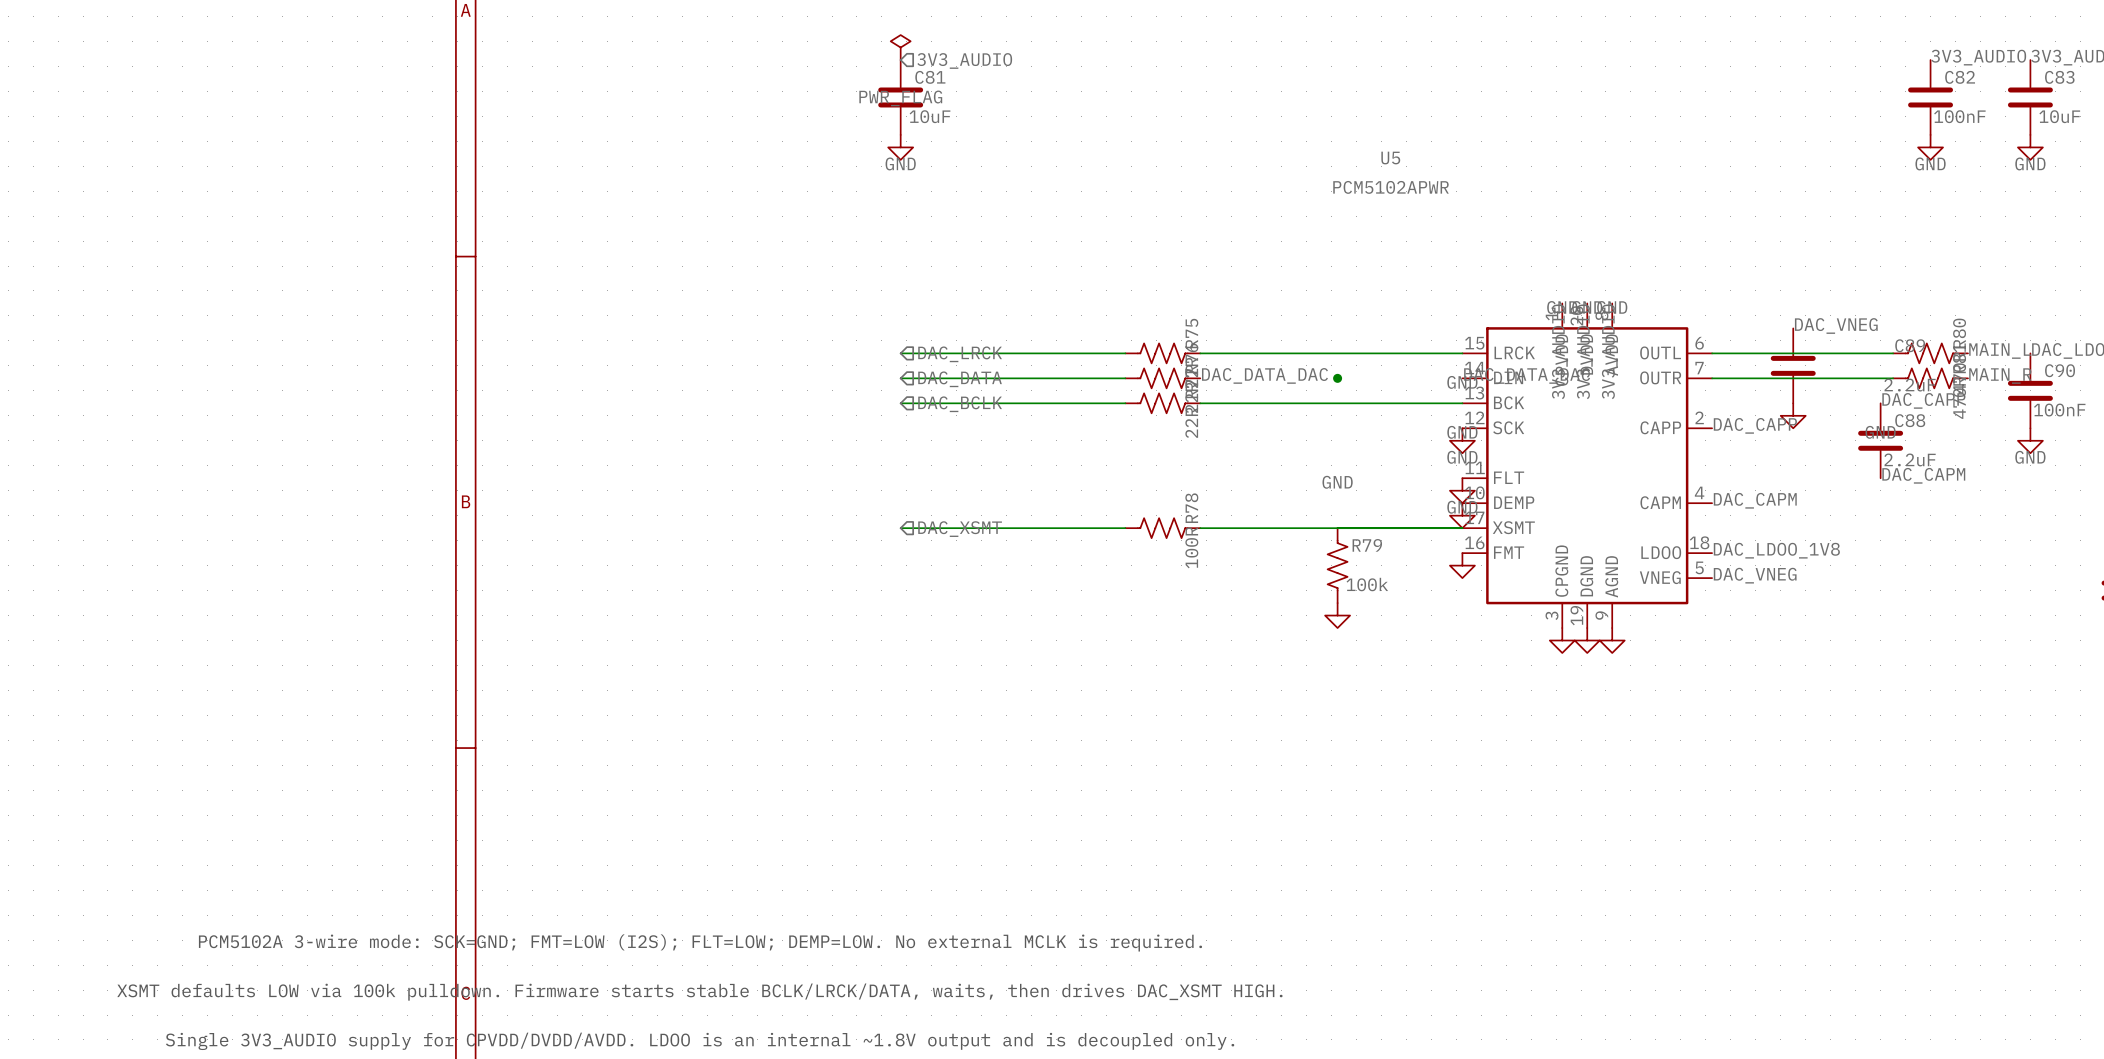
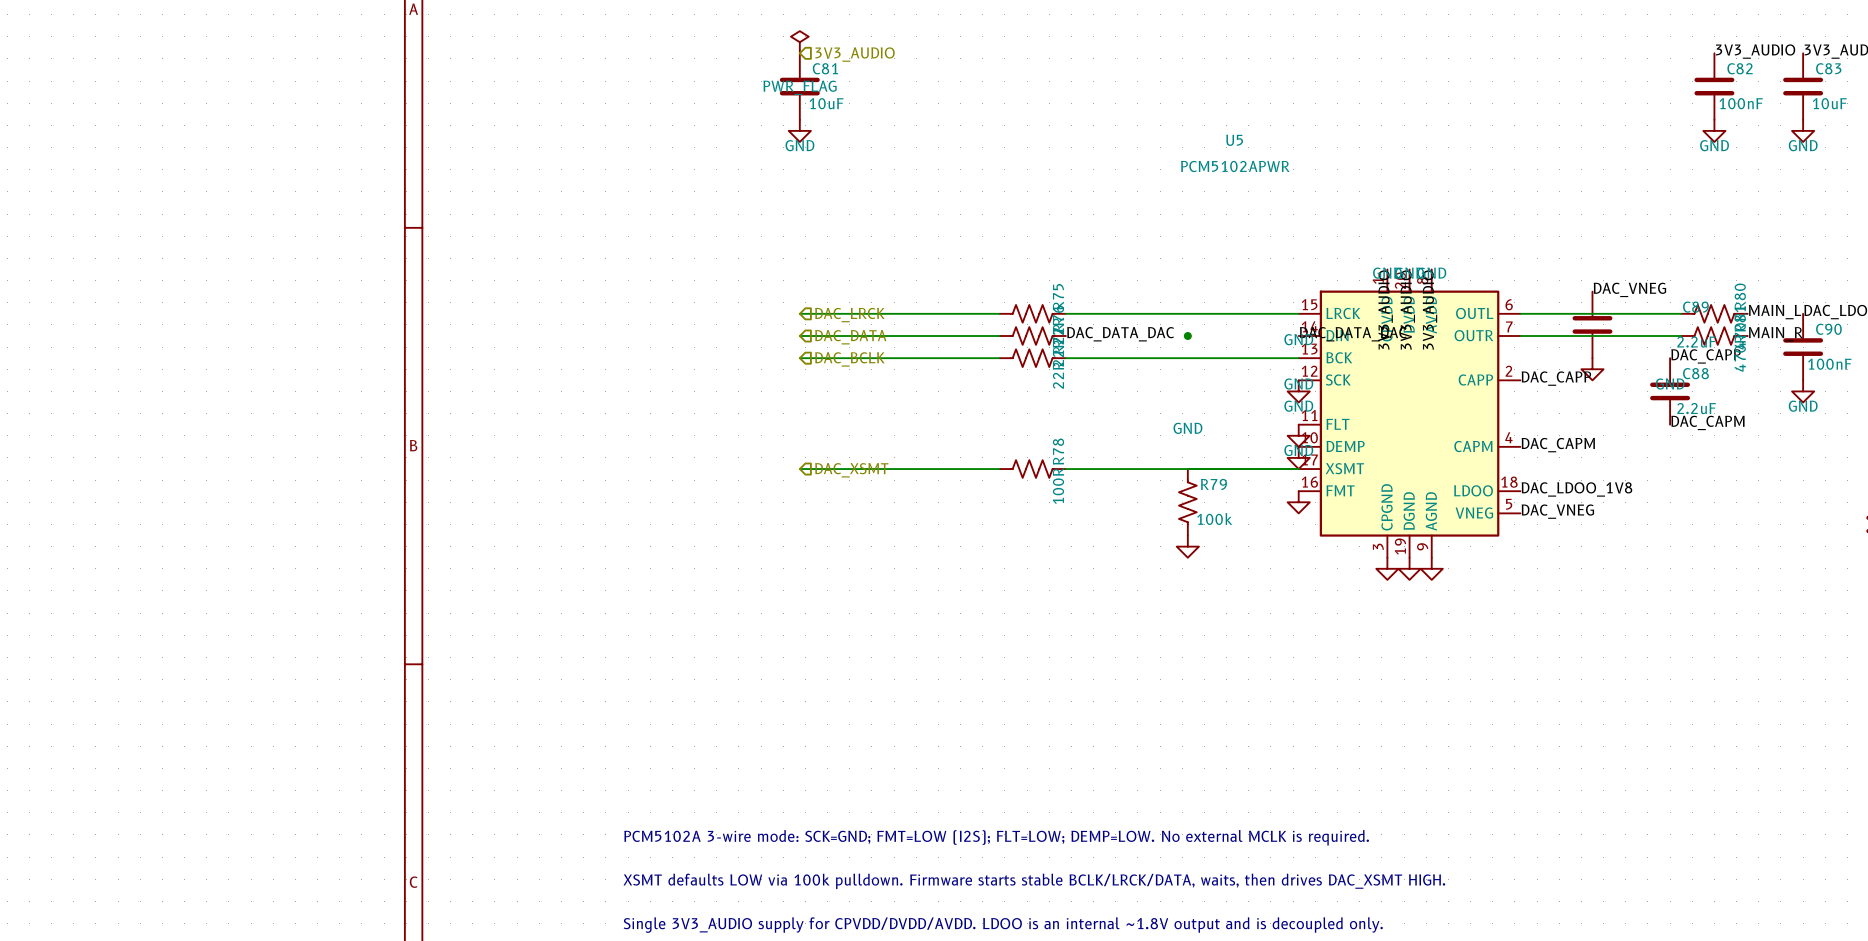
text position: PCM5102A 3-wire mode: SCK=GND; FMT=LOW (I2S); FLT=LOW; DEMP=LOW. No external MCLK is required. (700, 942) -> PCM5102A 3-wire mode: SCK=GND; FMT=LOW (I2S); FLT=LOW; DEMP=LOW. No external MCLK is required. (996, 837)
text position: XSMT defaults LOW via 100k pulldown. Firmware starts stable BCLK/LRCK/DATA, waits, then drives DAC_XSMT HIGH. (699, 992) -> XSMT defaults LOW via 100k pulldown. Firmware starts stable BCLK/LRCK/DATA, waits, then drives DAC_XSMT HIGH. (1034, 881)
text position: Single 3V3_AUDIO supply for CPVDD/DVDD/AVDD. LDOO is an internal ~1.8V output and is decoupled only. (700, 1041) -> Single 3V3_AUDIO supply for CPVDD/DVDD/AVDD. LDOO is an internal ~1.8V output and is decoupled only. (1003, 925)

